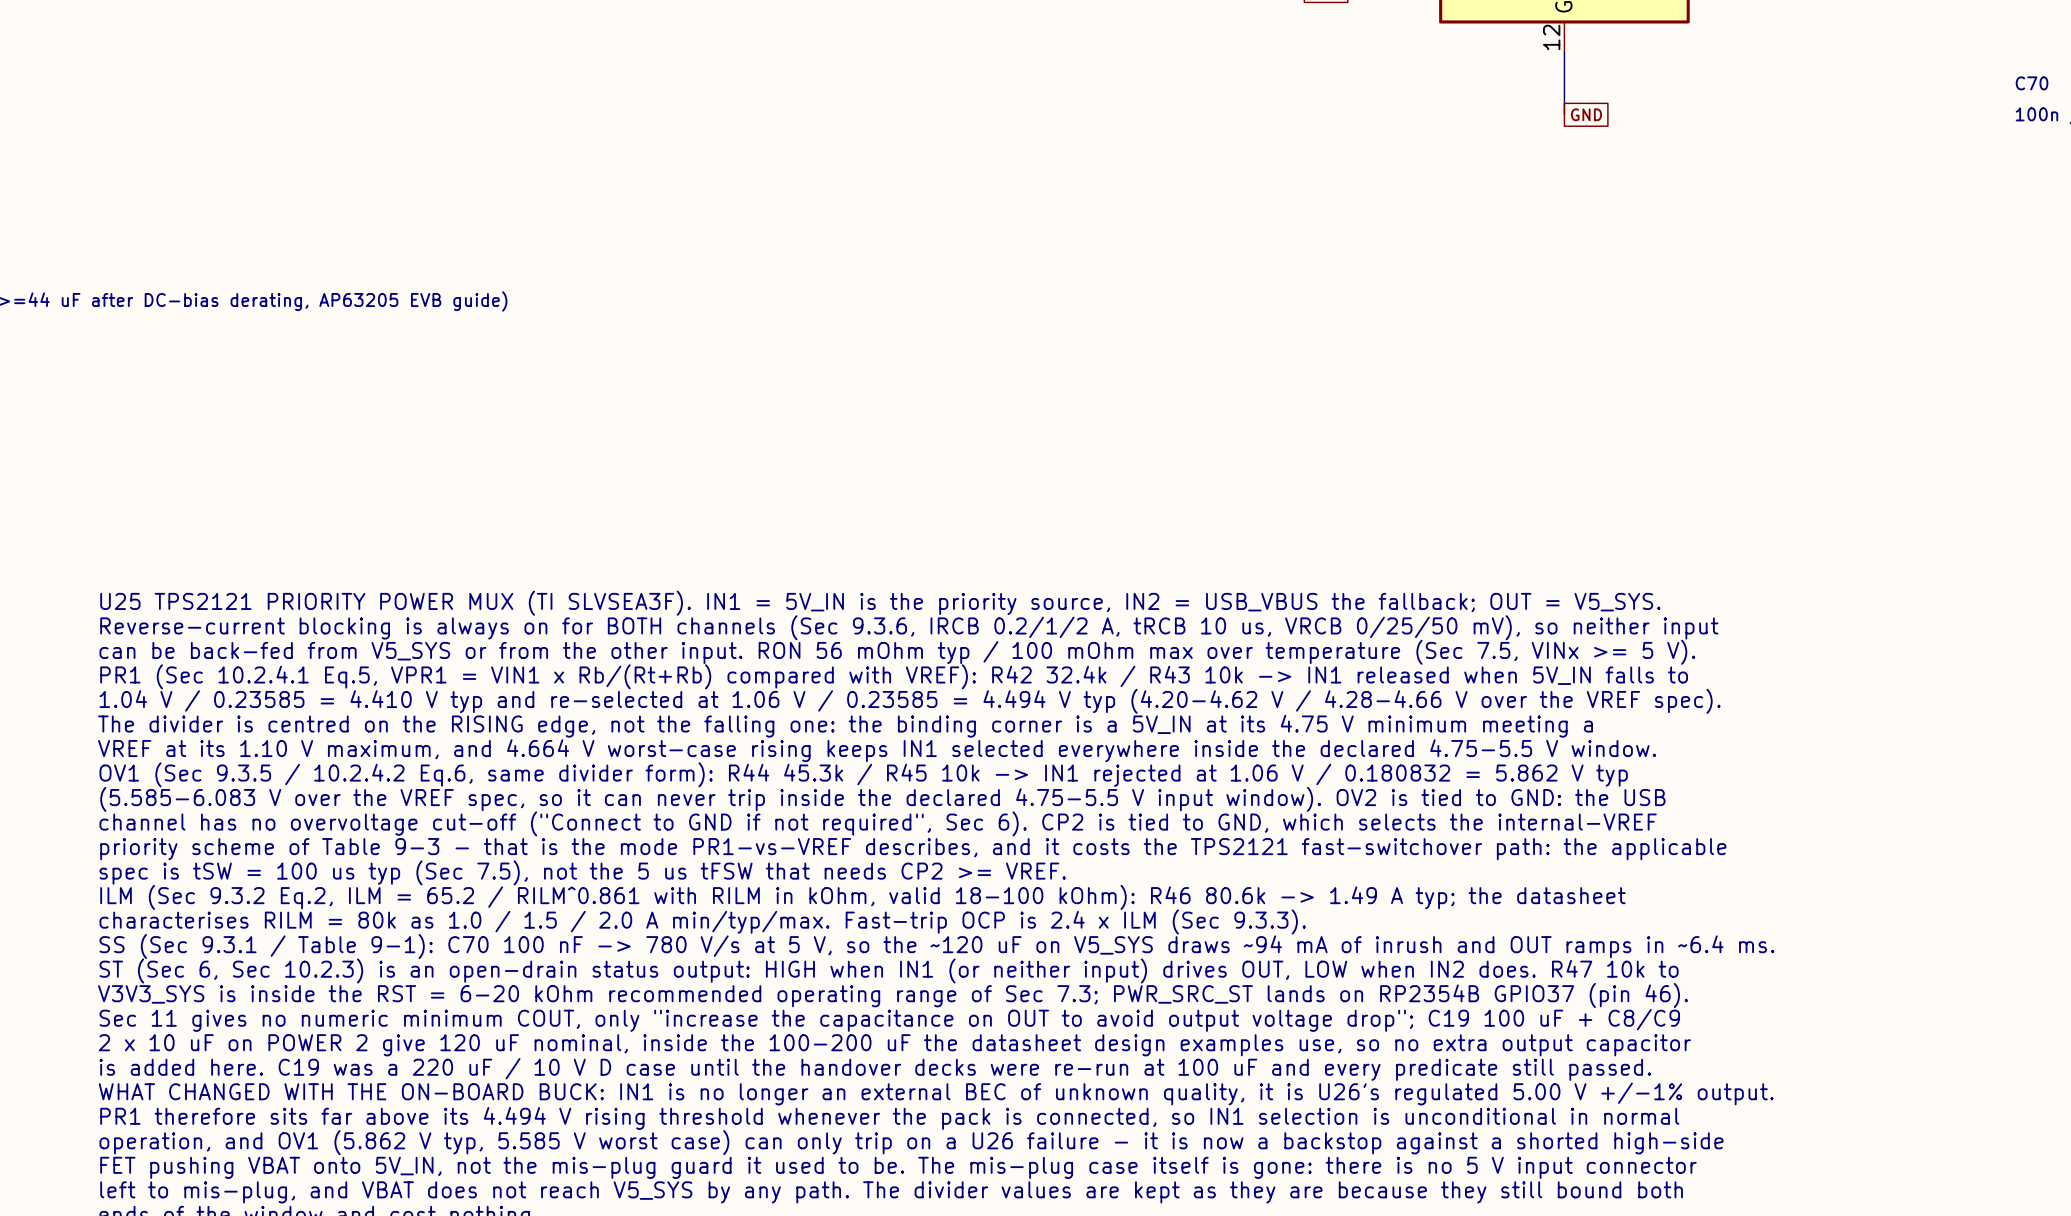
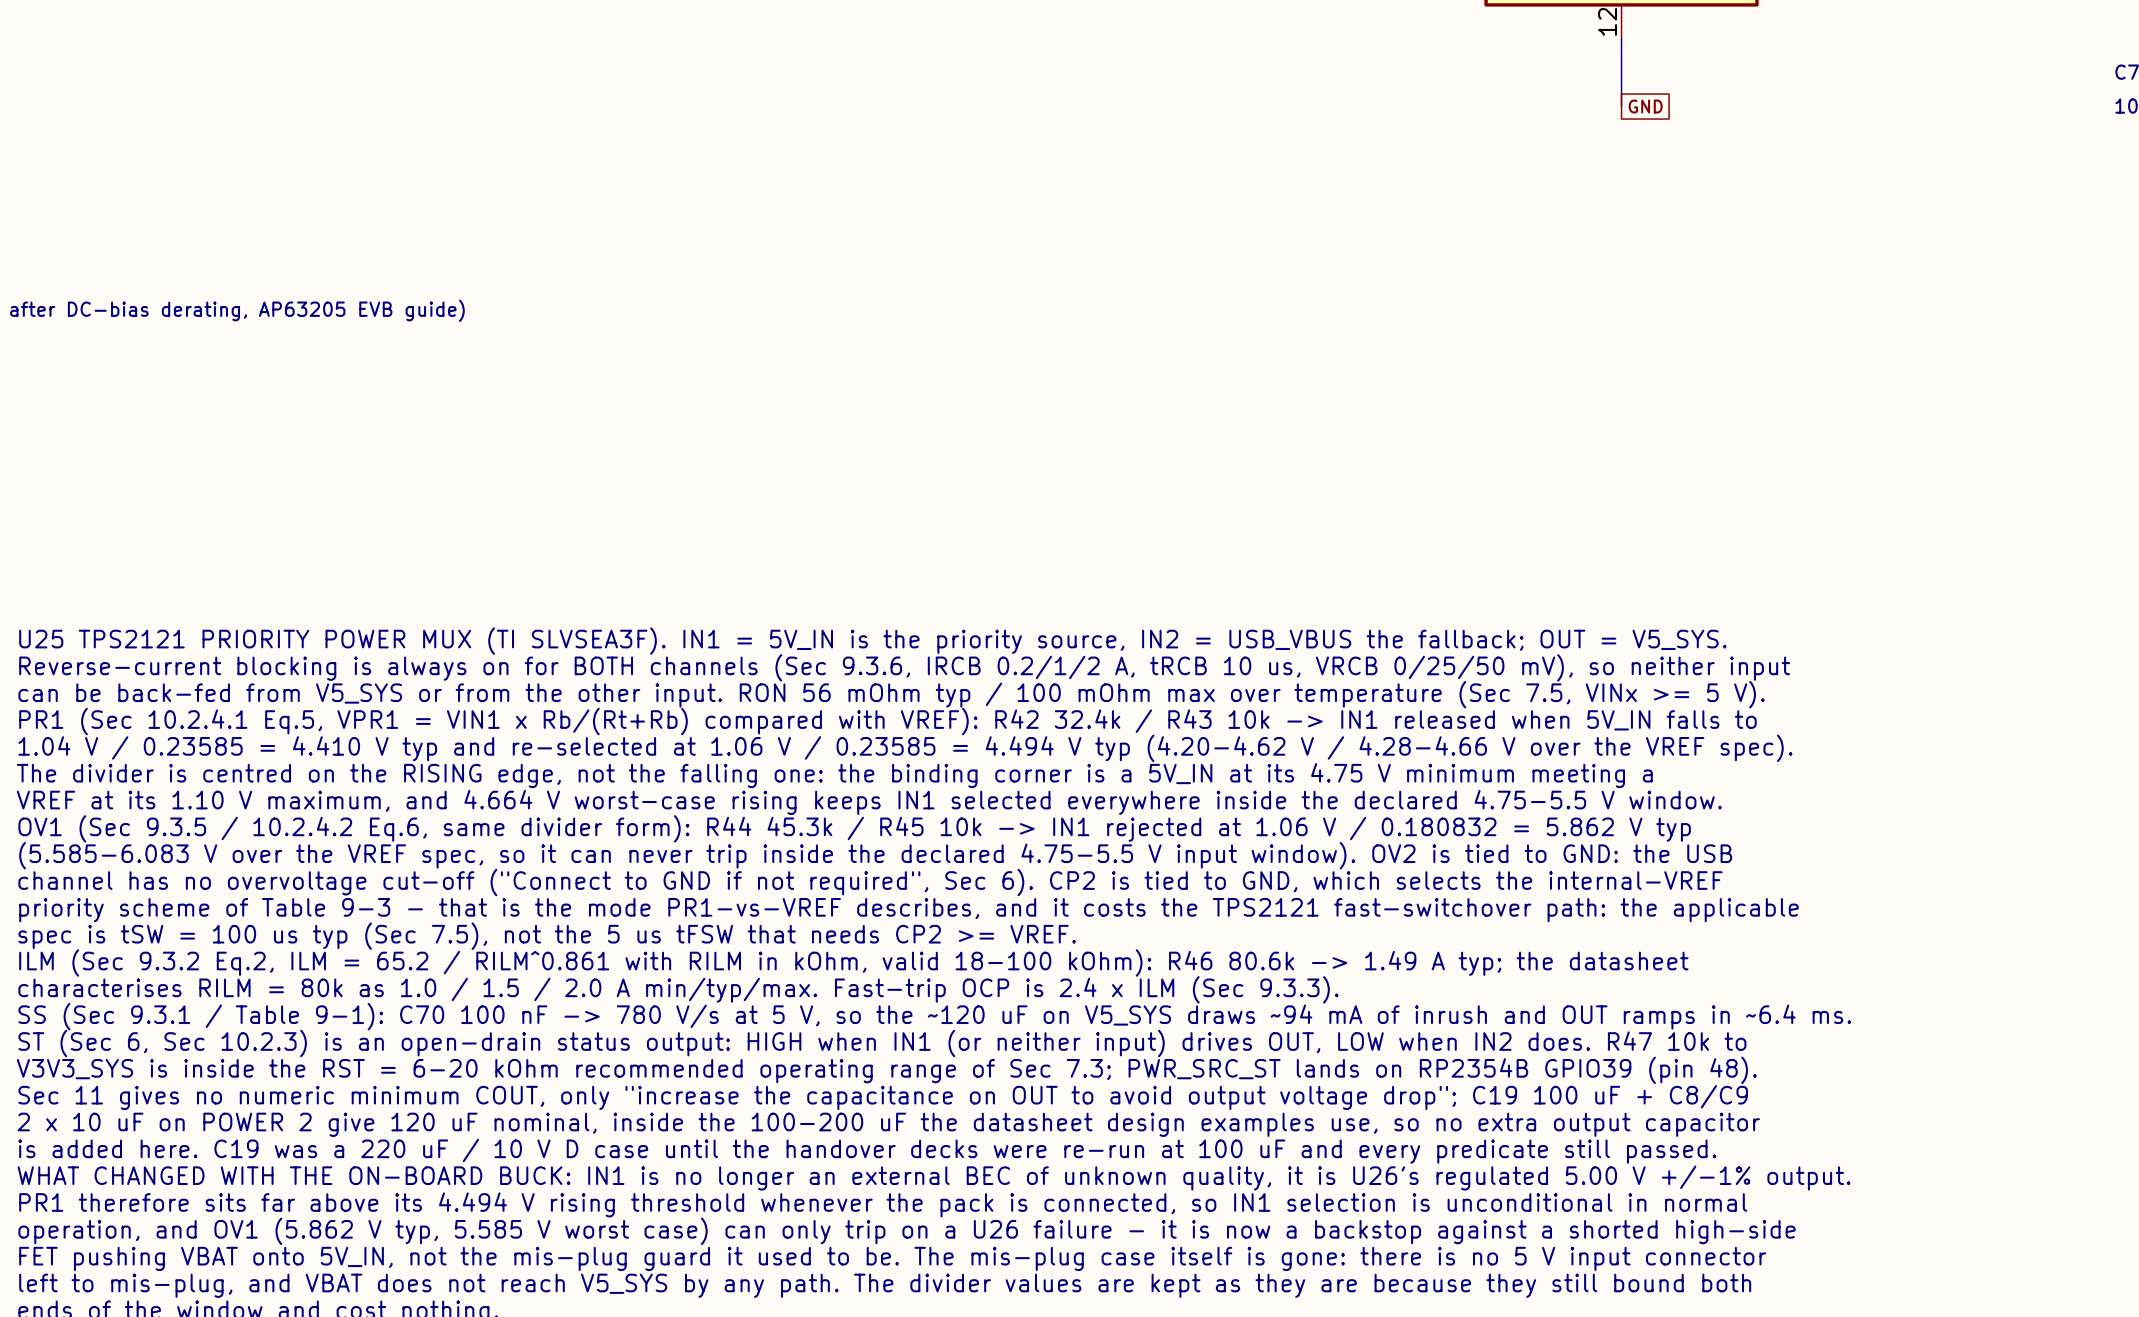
text: V3V3_SYS is inside the RST = 6-20 kOhm recommended operating range of Sec 7.3; PWR_SRC_ST lands on RP2354B GPIO37 (pin 46). (893, 995) -> V3V3_SYS is inside the RST = 6-20 kOhm recommended operating range of Sec 7.3; PWR_SRC_ST lands on RP2354B GPIO39 (pin 48). (886, 1070)

